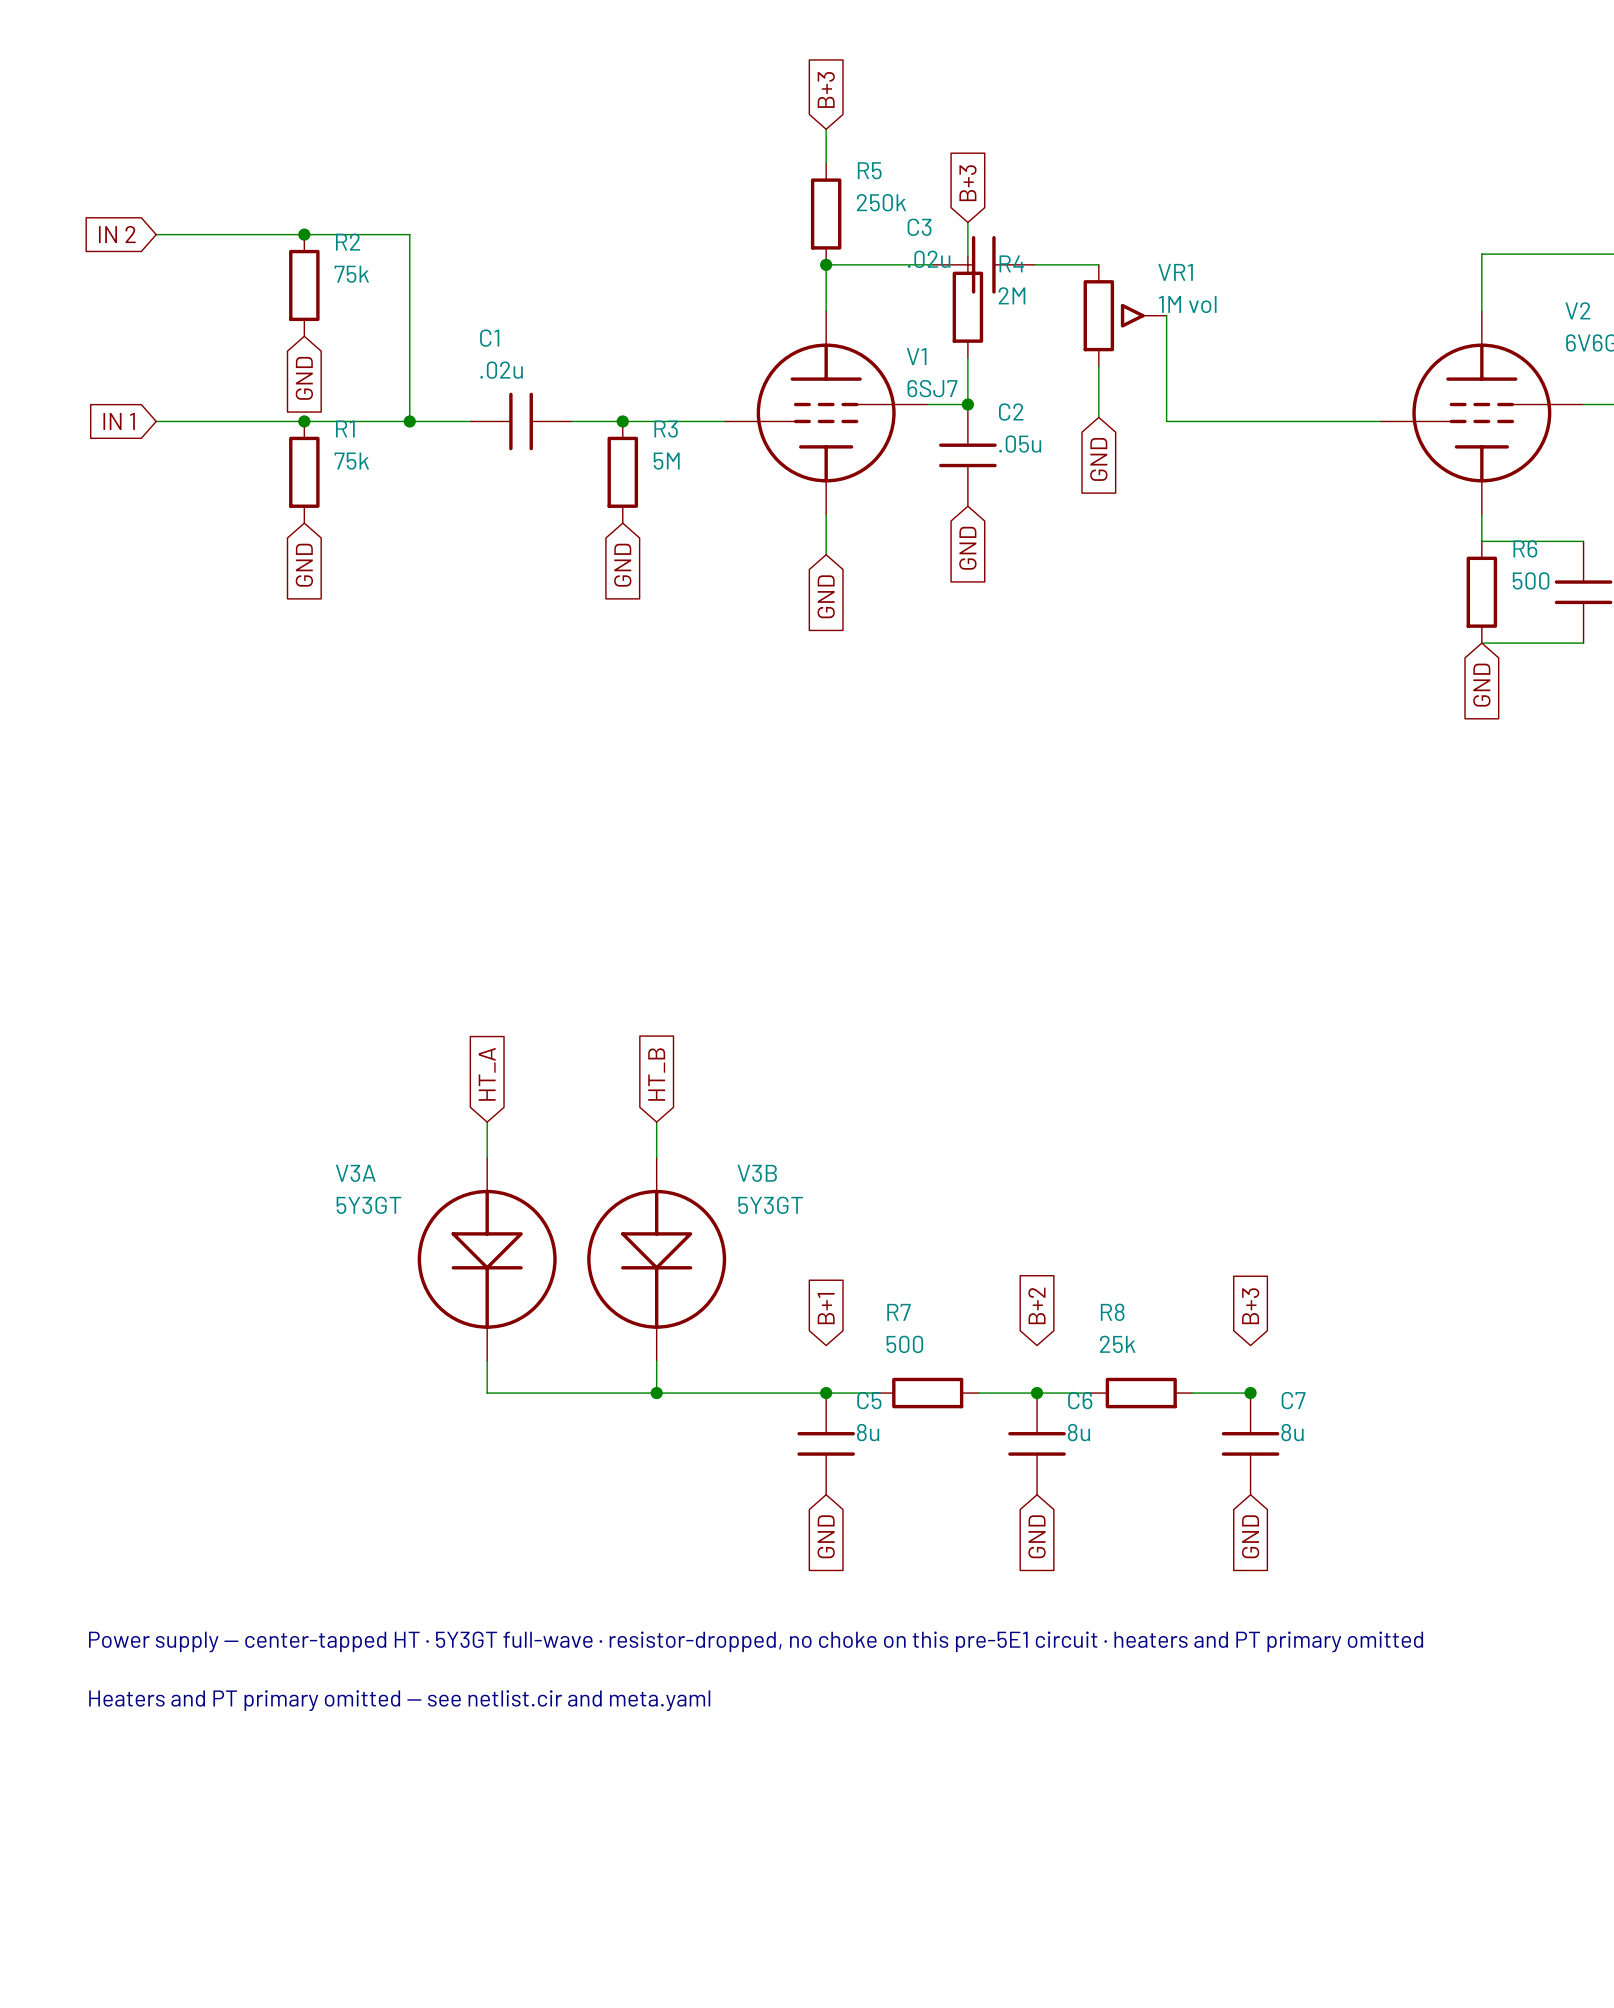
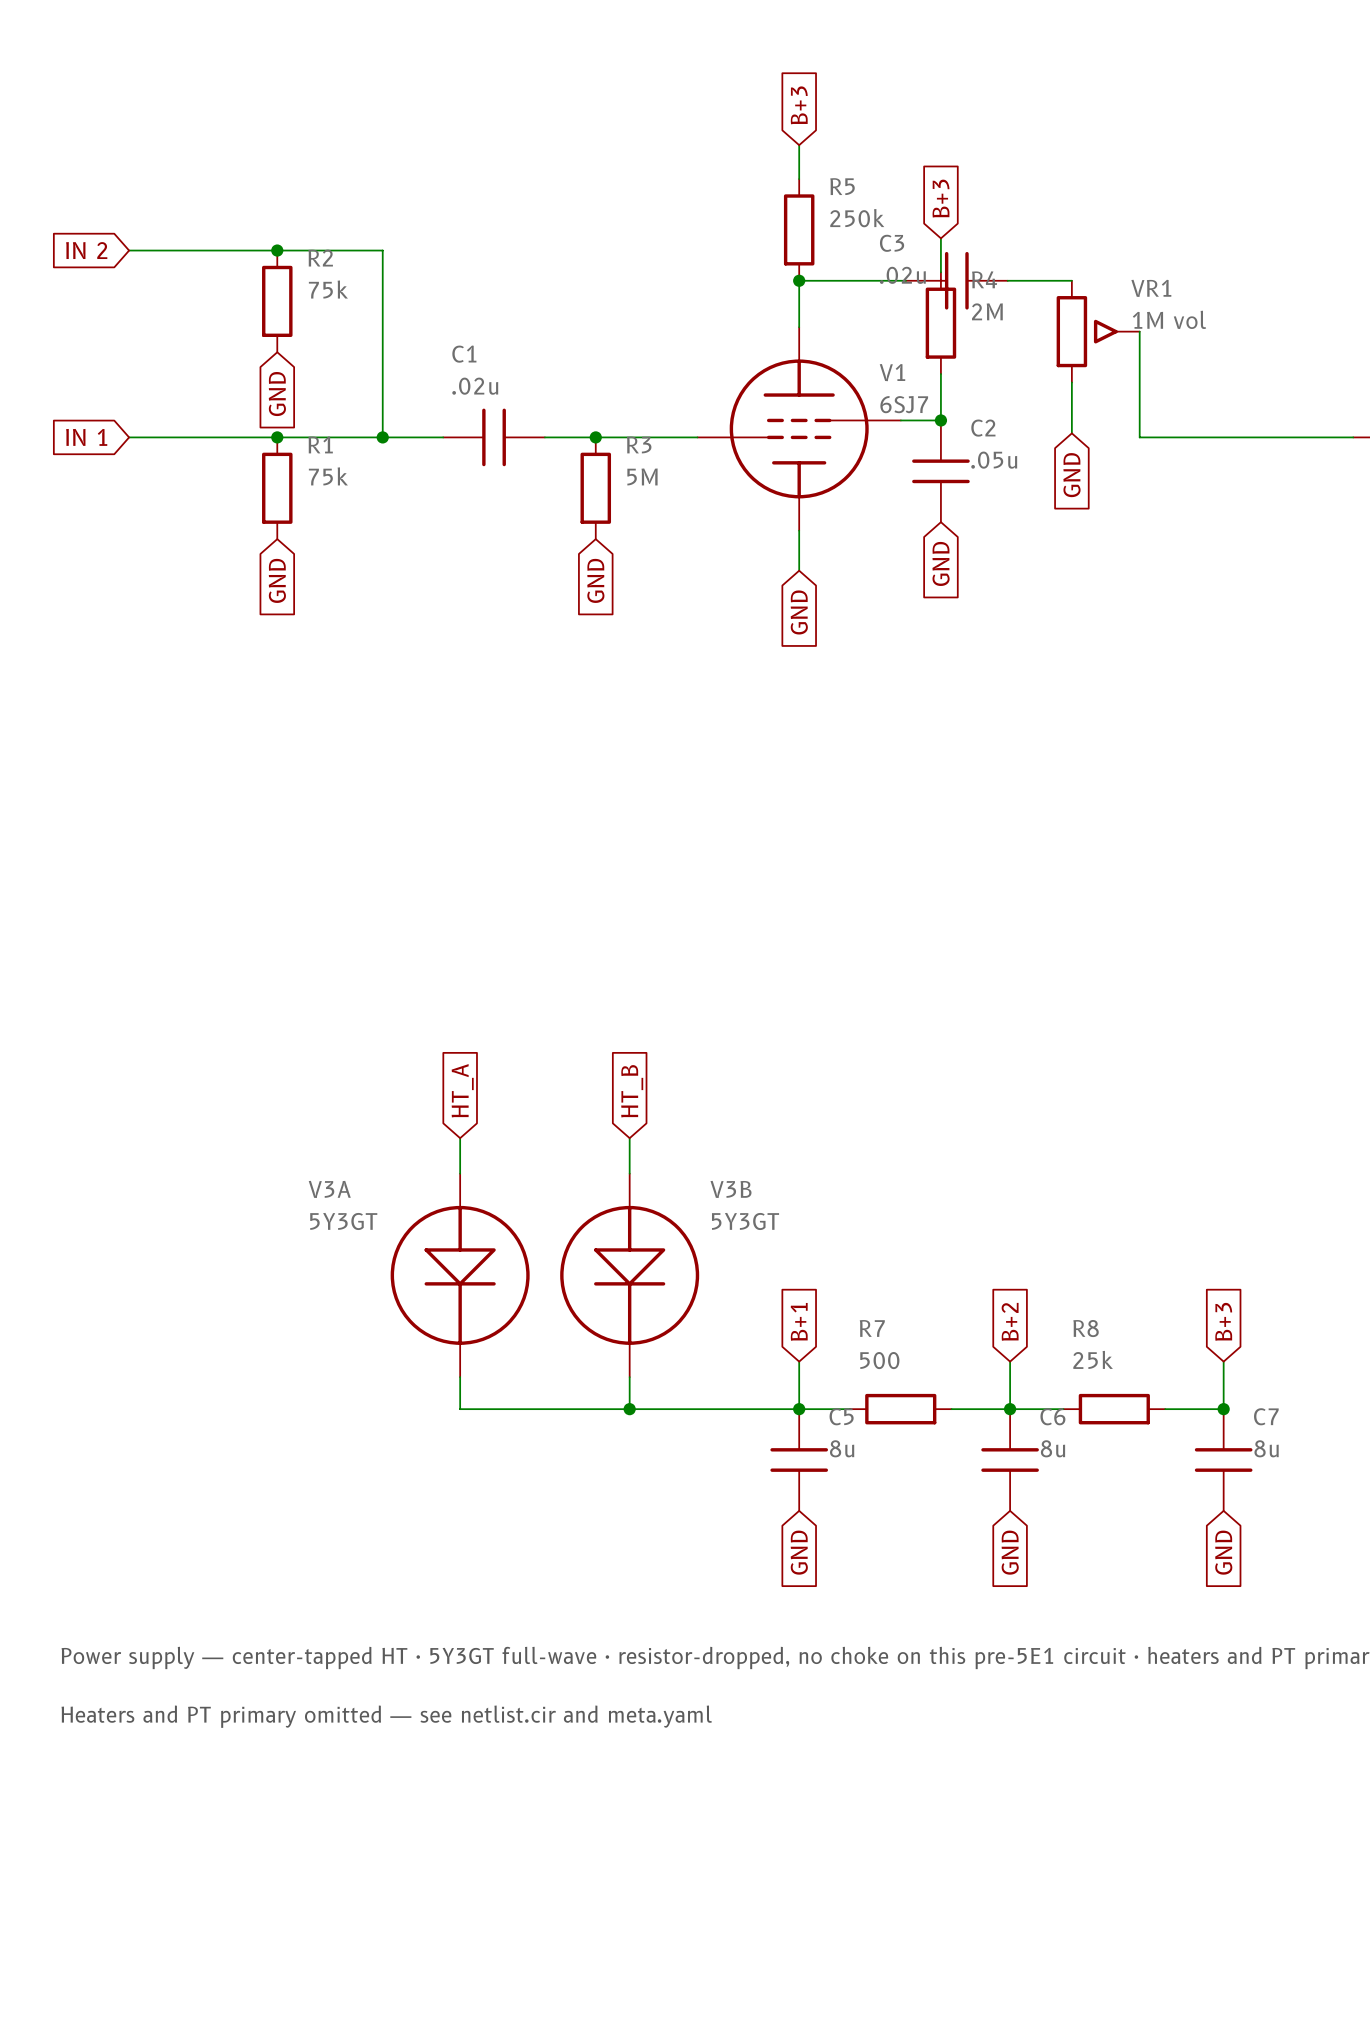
wire: none -> (799, 1361) (799, 1409)
wire: none -> (1010, 1361) (1010, 1409)
wire: none -> (1223, 1361) (1223, 1409)

